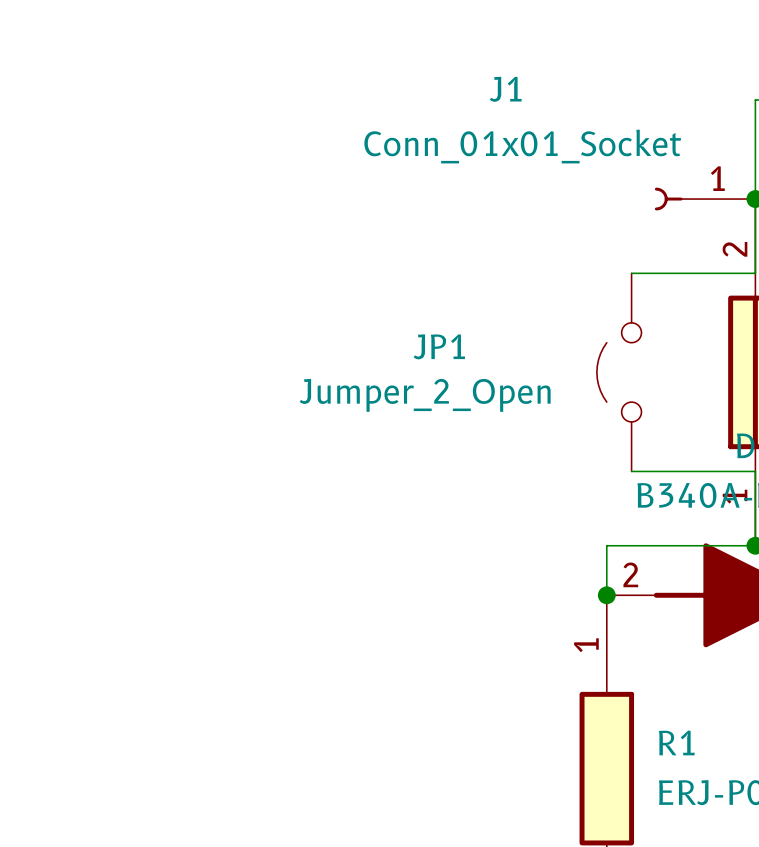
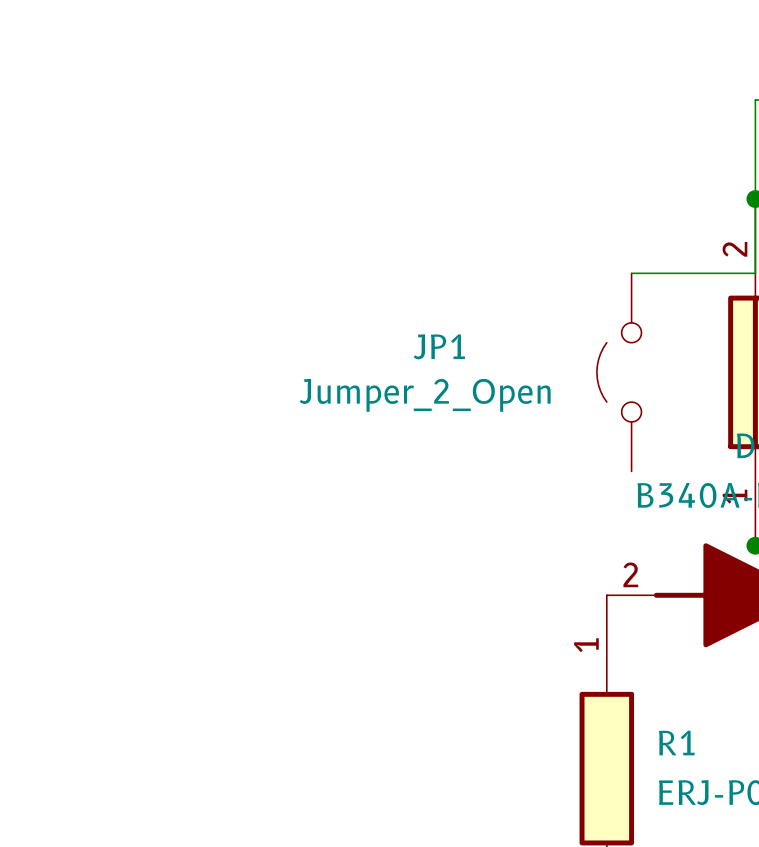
J1: Conn_01x01_Socket (705, 199) -> none
wire: (631, 471) (755, 471) (755, 545) (606, 545) (606, 595) -> none
junction: (606, 595) -> none

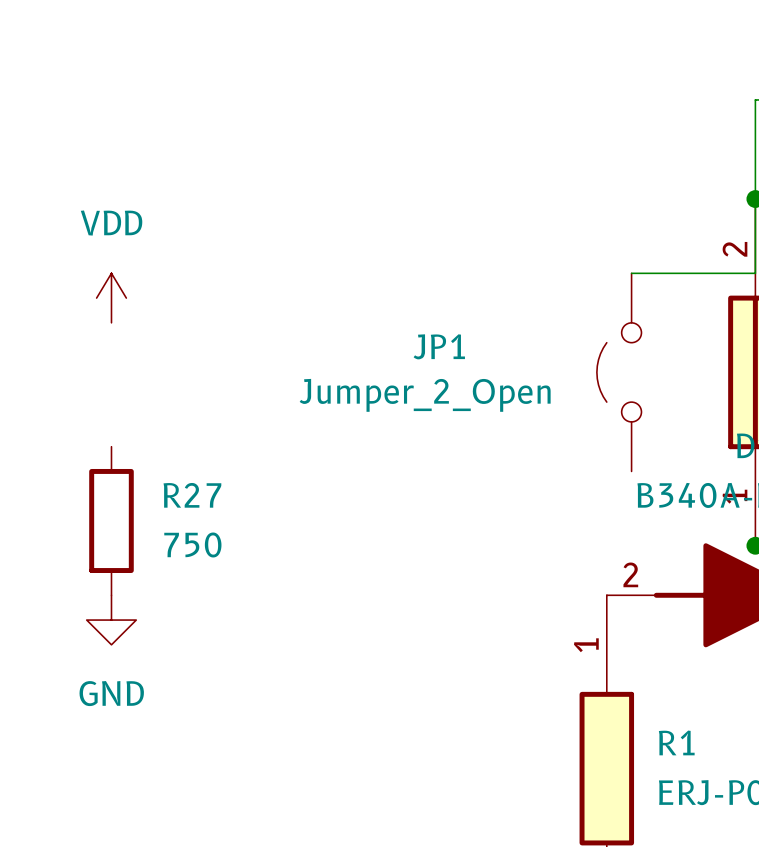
power symbol: none -> VDD (111, 298)
R27: none -> 750 (111, 520)
power symbol: none -> GND (111, 620)

